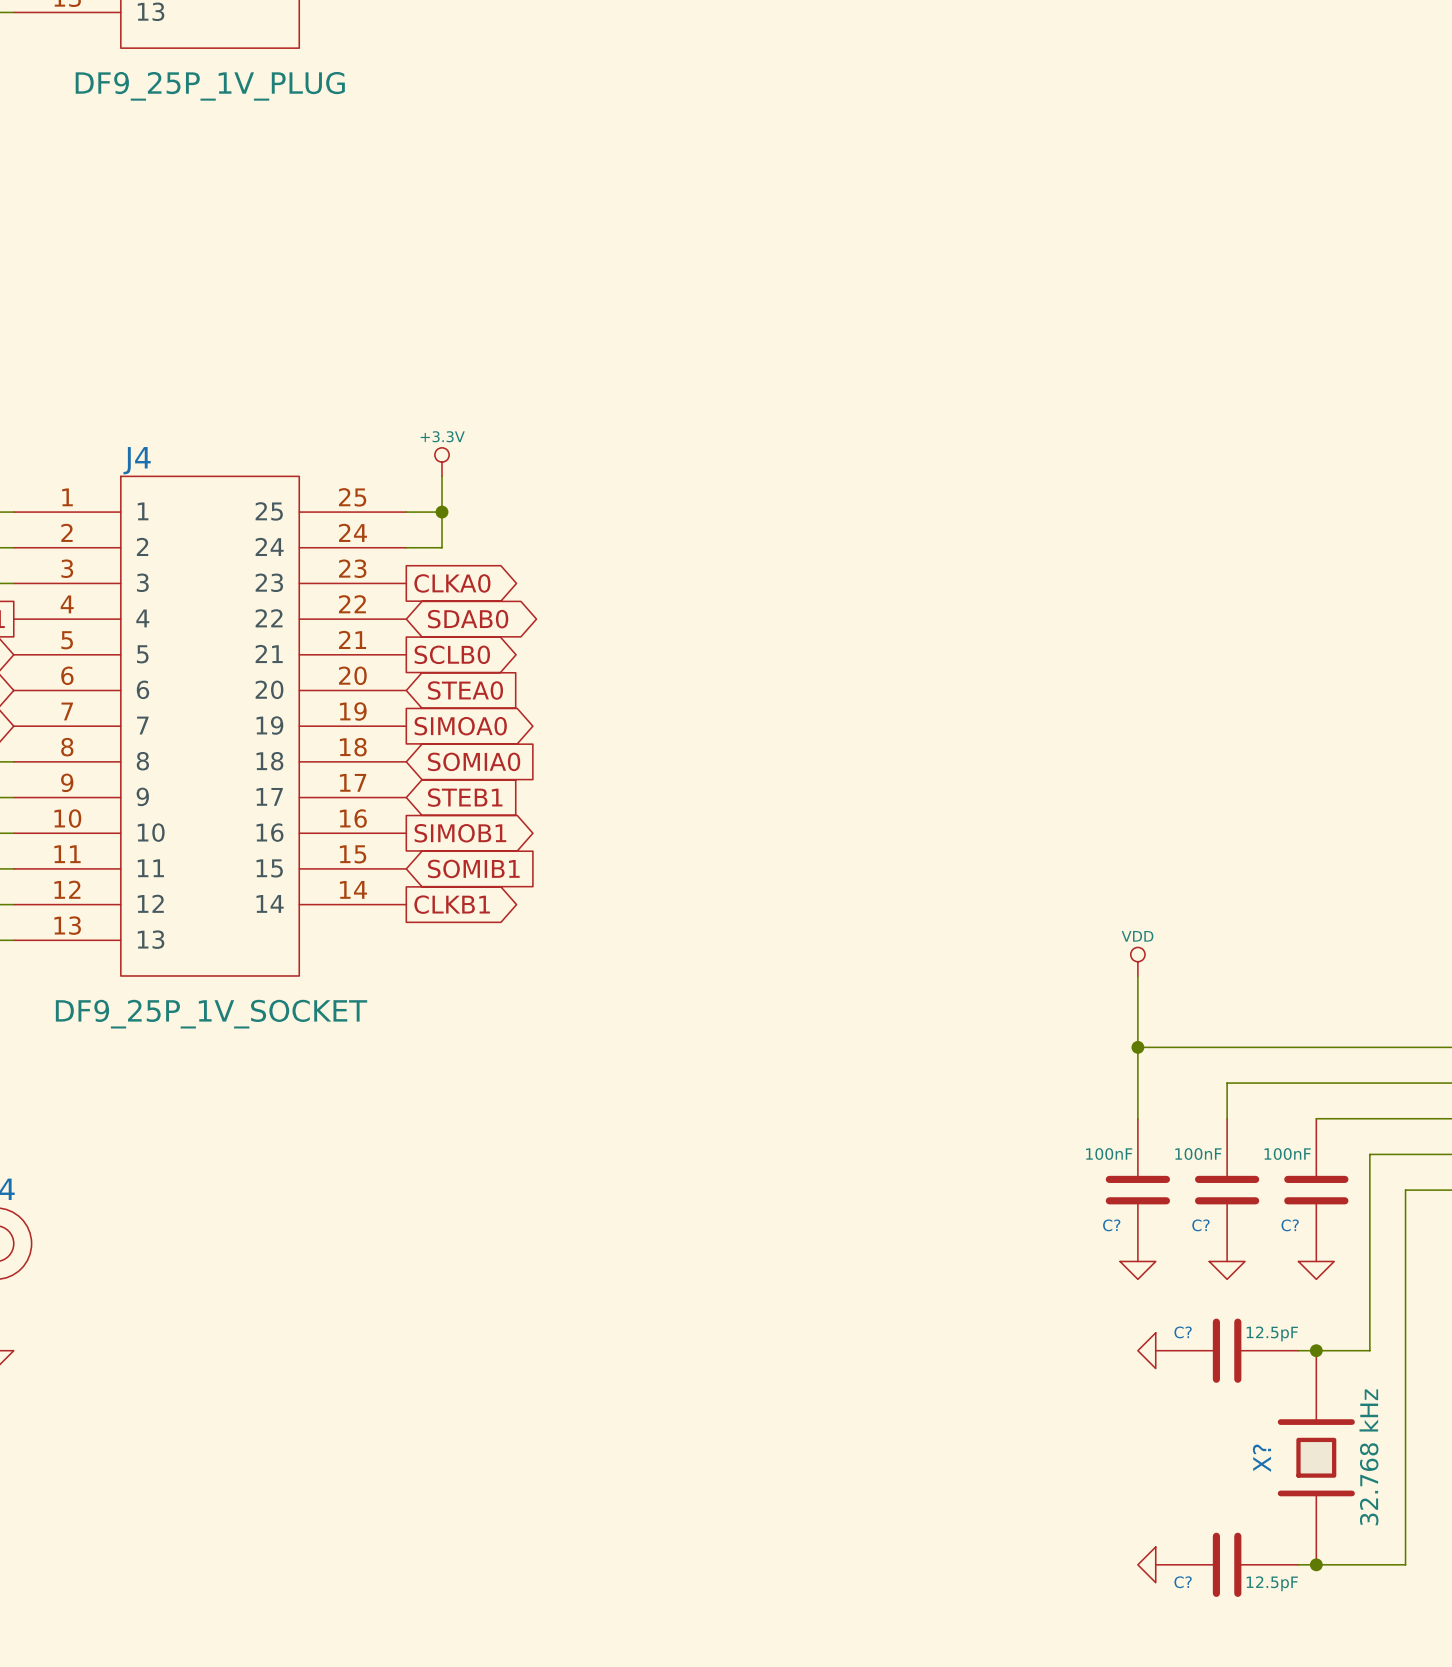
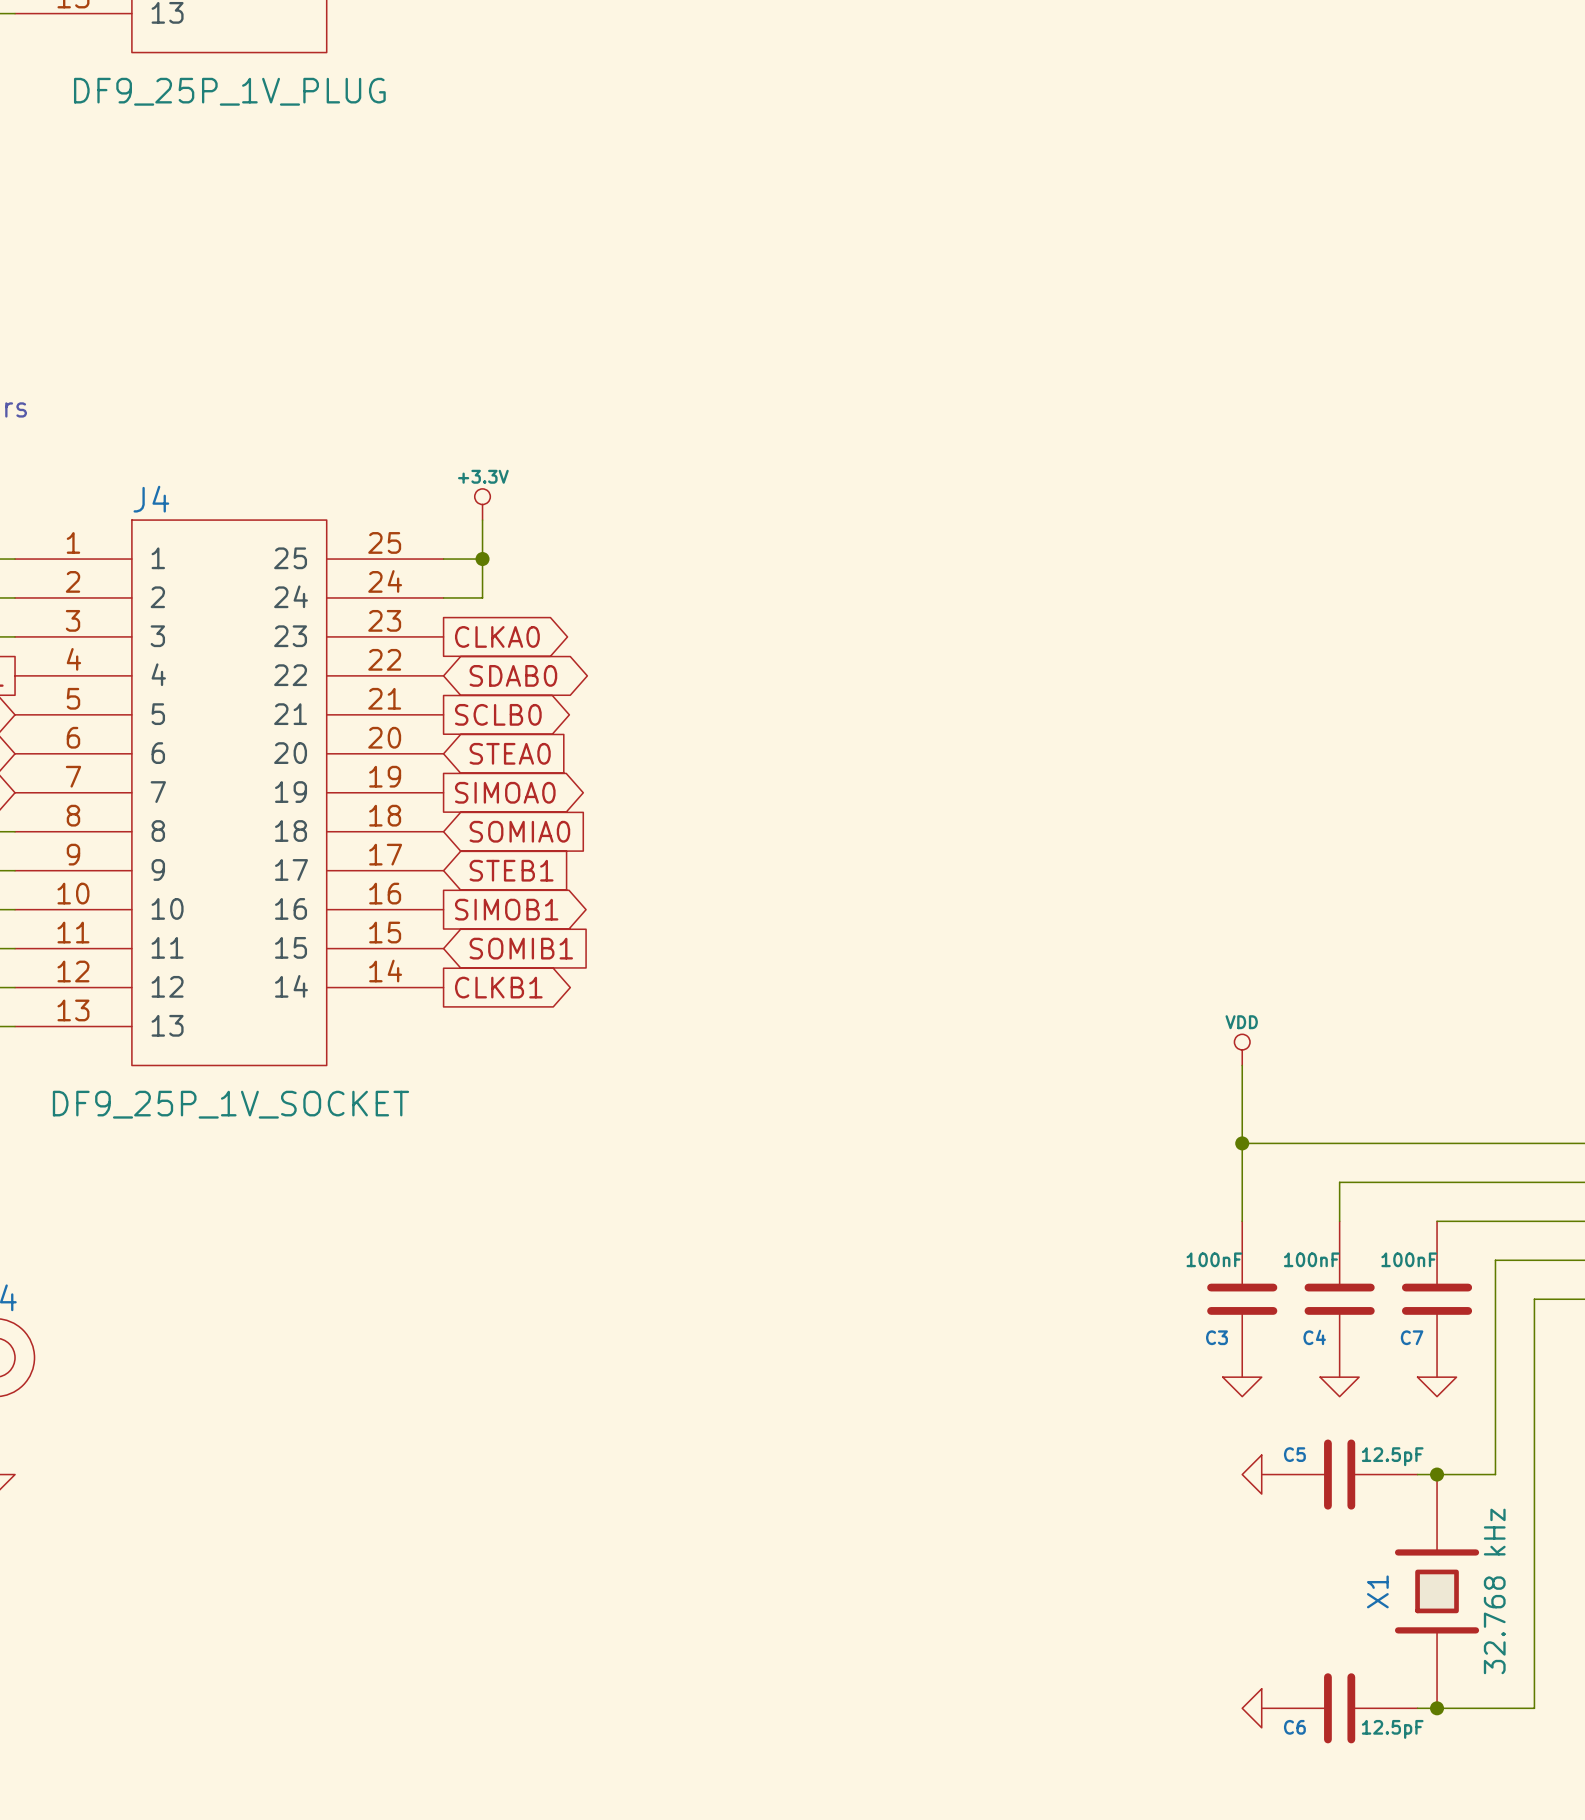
C? name: C? (1111, 1225) -> C3 (1216, 1337)
C? name: C? (1200, 1225) -> C4 (1314, 1337)
C? name: C? (1290, 1225) -> C7 (1412, 1337)
C? name: C? (1183, 1332) -> C5 (1294, 1454)
X? name: X? (1261, 1458) -> X1 (1377, 1591)
C? name: C? (1183, 1582) -> C6 (1294, 1727)

